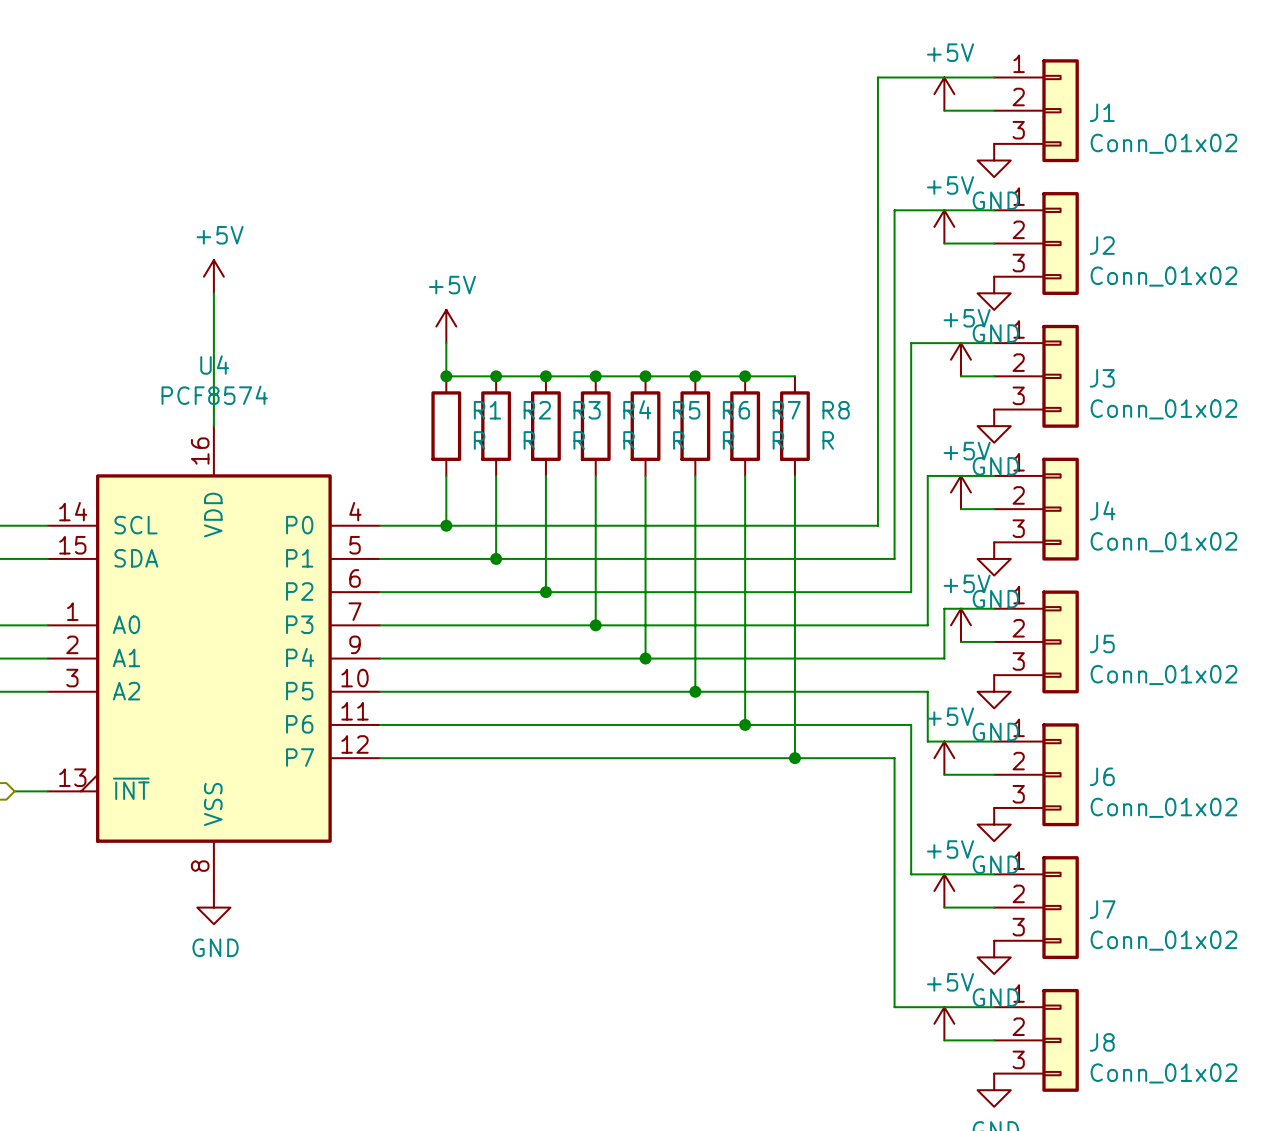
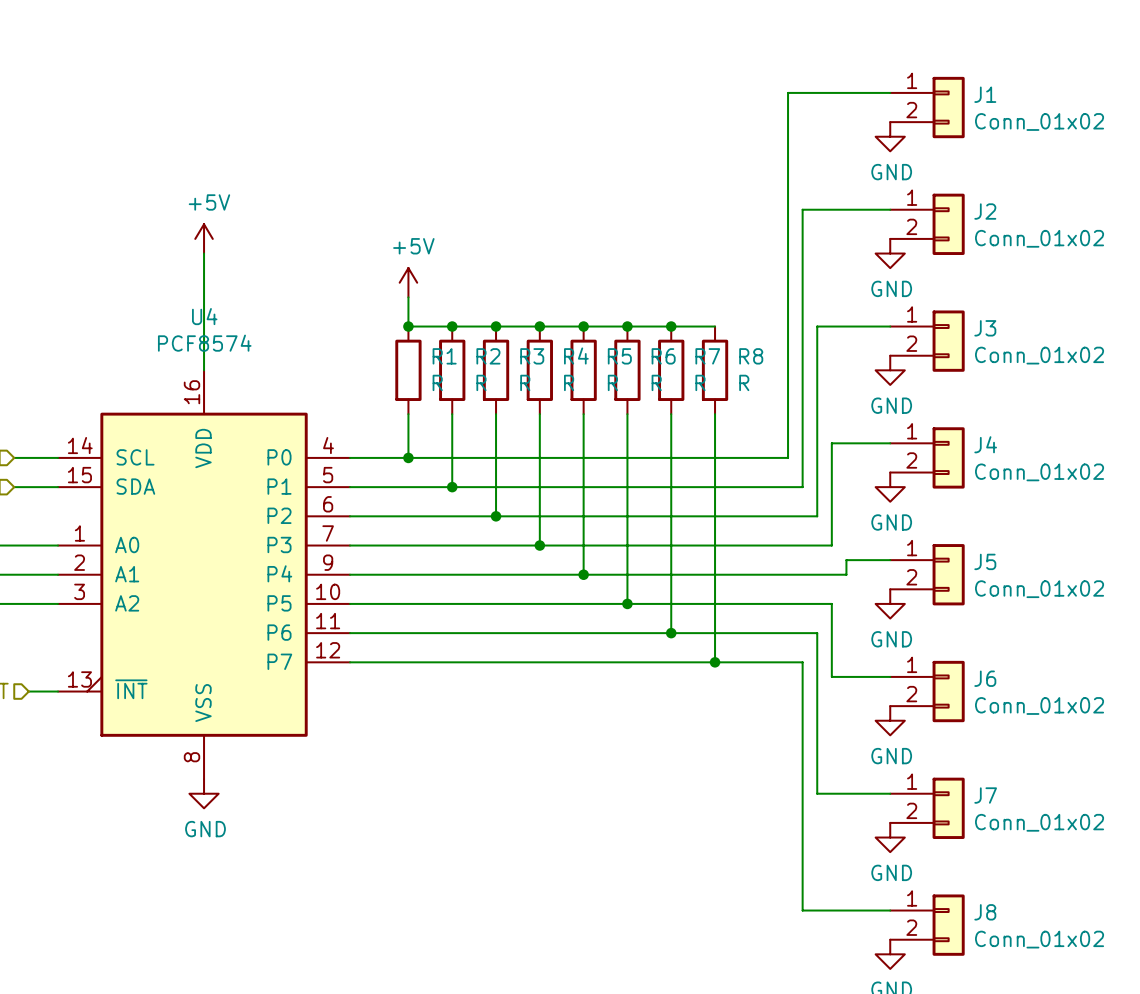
J1 symbol: [994, 59, 1079, 163] -> [890, 76, 965, 139]
wire: (994, 77) (877, 77) (877, 110) -> (846, 92) (788, 92)
power symbol: +5V (944, 94) -> none
J2 symbol: [994, 192, 1079, 295] -> [890, 193, 965, 255]
wire: (994, 210) (894, 210) (894, 243) -> (846, 209) (802, 209)
power symbol: +5V (944, 226) -> none
J3 symbol: [994, 324, 1079, 428] -> [890, 310, 965, 372]
wire: (994, 343) (911, 343) (911, 376) -> (861, 326) (817, 326)
power symbol: +5V (960, 359) -> none
J4 symbol: [994, 457, 1079, 561] -> [890, 427, 965, 489]
wire: (994, 475) (927, 475) (927, 509) -> (861, 443) (831, 443)
power symbol: +5V (960, 492) -> none
J5 symbol: [994, 590, 1079, 694] -> [890, 544, 965, 606]
wire: (994, 608) (944, 608) (944, 641) -> (861, 560) (846, 560)
power symbol: +5V (960, 625) -> none
J6 symbol: [994, 723, 1079, 827] -> [890, 660, 965, 723]
wire: (927, 741) (994, 741) -> (831, 647) (831, 676) (846, 676)
power symbol: +5V (944, 758) -> none
J7 symbol: [994, 856, 1079, 960] -> [890, 777, 965, 839]
wire: (911, 874) (994, 874) -> (817, 764) (817, 793) (846, 793)
power symbol: +5V (944, 890) -> none
J8 symbol: [994, 988, 1079, 1092] -> [890, 894, 965, 956]
wire: (894, 1007) (994, 1007) -> (802, 881) (802, 910) (846, 910)
power symbol: +5V (944, 1023) -> none

